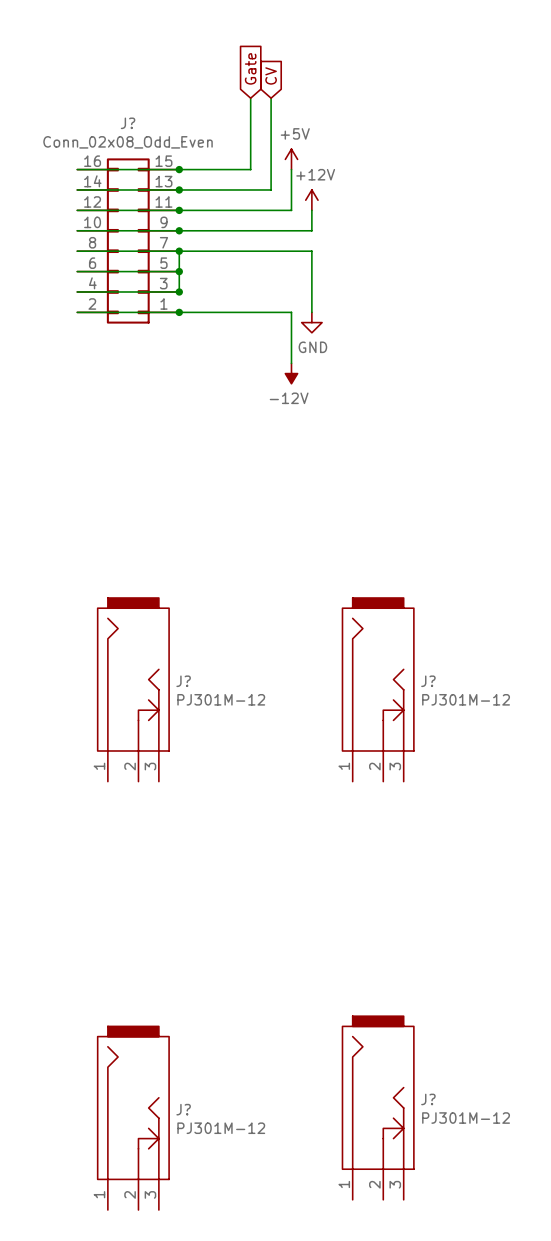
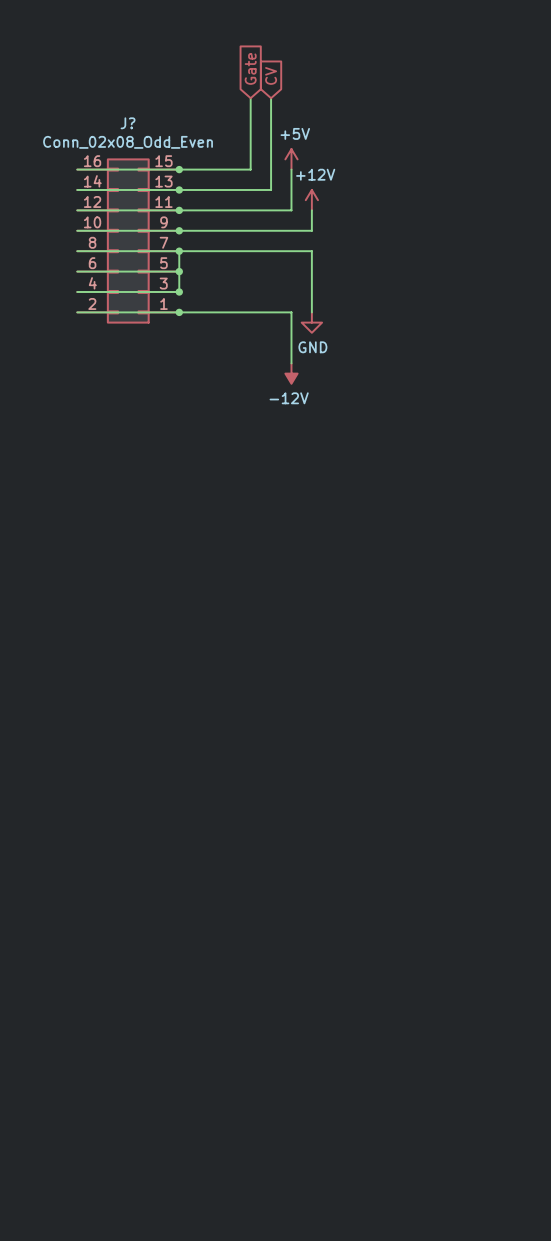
J?: PJ301M-12 (133, 689) -> none
J?: PJ301M-12 (378, 689) -> none
J?: PJ301M-12 (378, 1108) -> none
J?: PJ301M-12 (133, 1118) -> none

